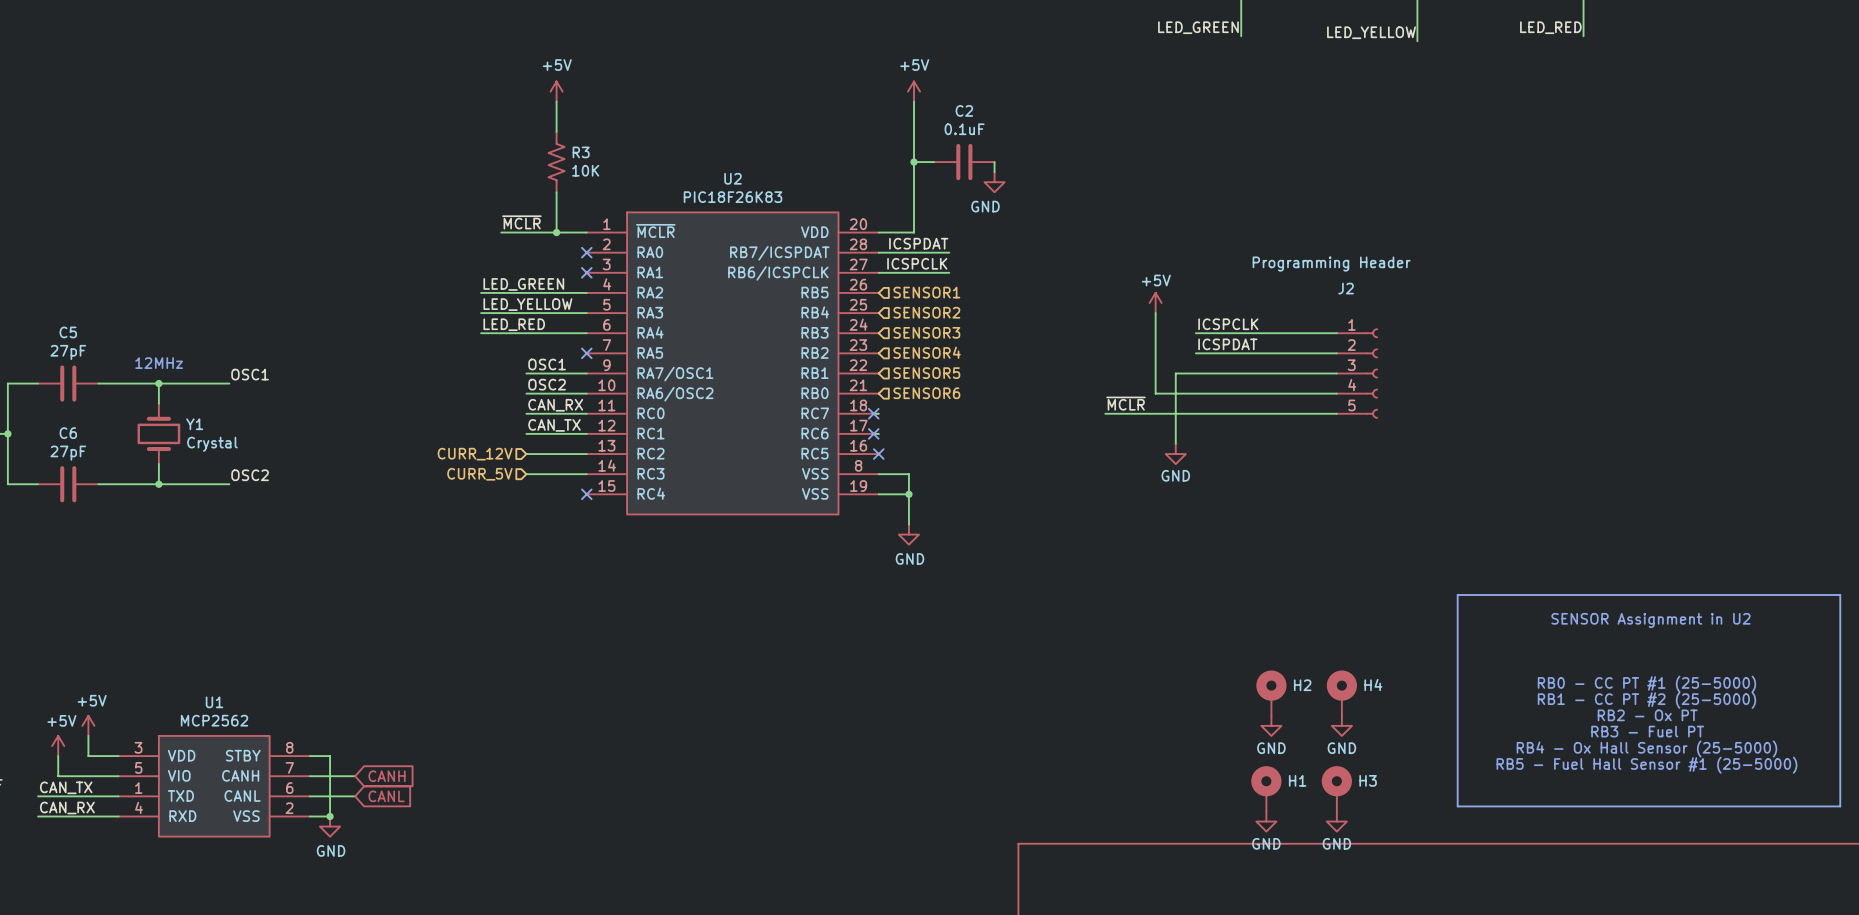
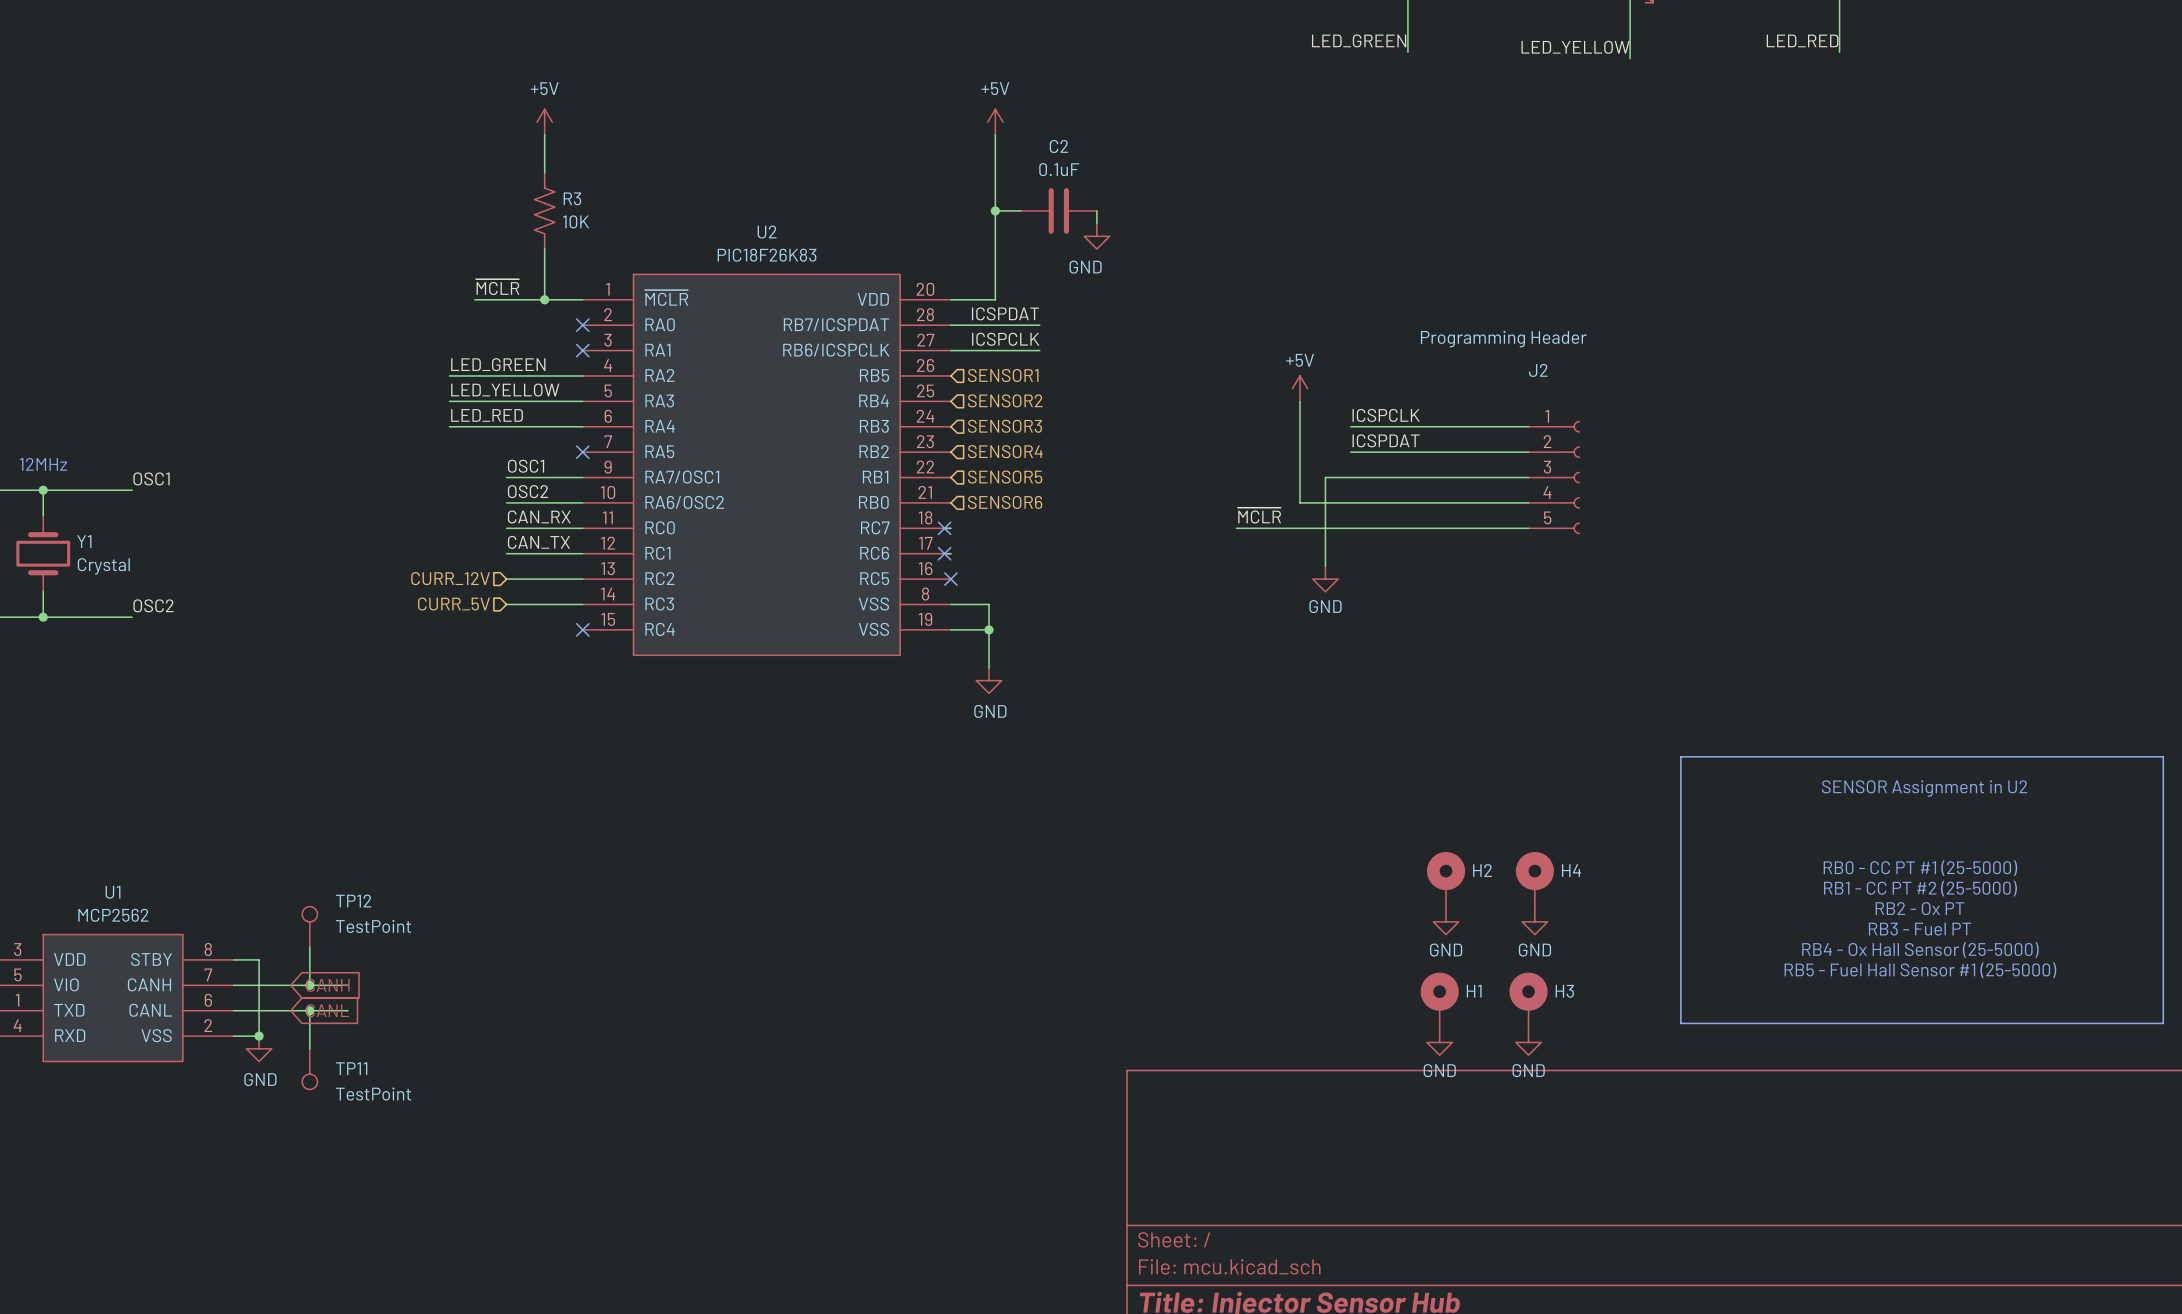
TP12: none -> TestPoint (309, 926)
wire: none -> (309, 947) (309, 985)
wire: none -> (290, 985) (347, 985)
junction: none -> (309, 985)
wire: none -> (290, 1010) (347, 1010)
wire: none -> (309, 1010) (309, 1048)
junction: none -> (309, 1010)
TP11: none -> TestPoint (309, 1069)

